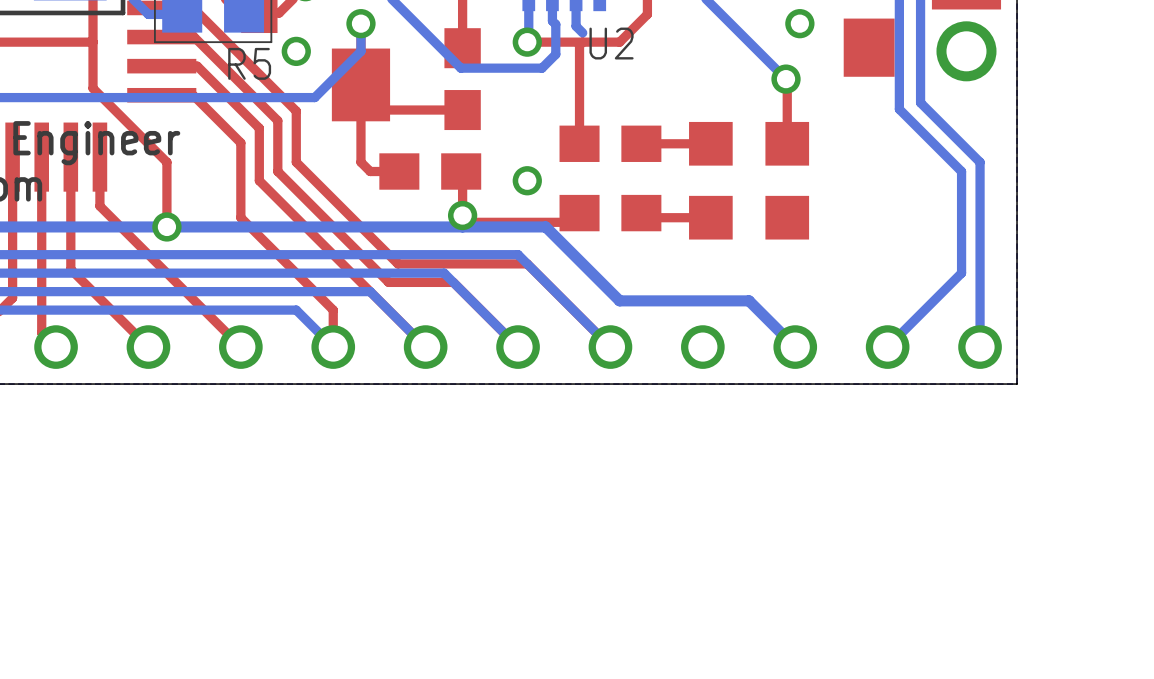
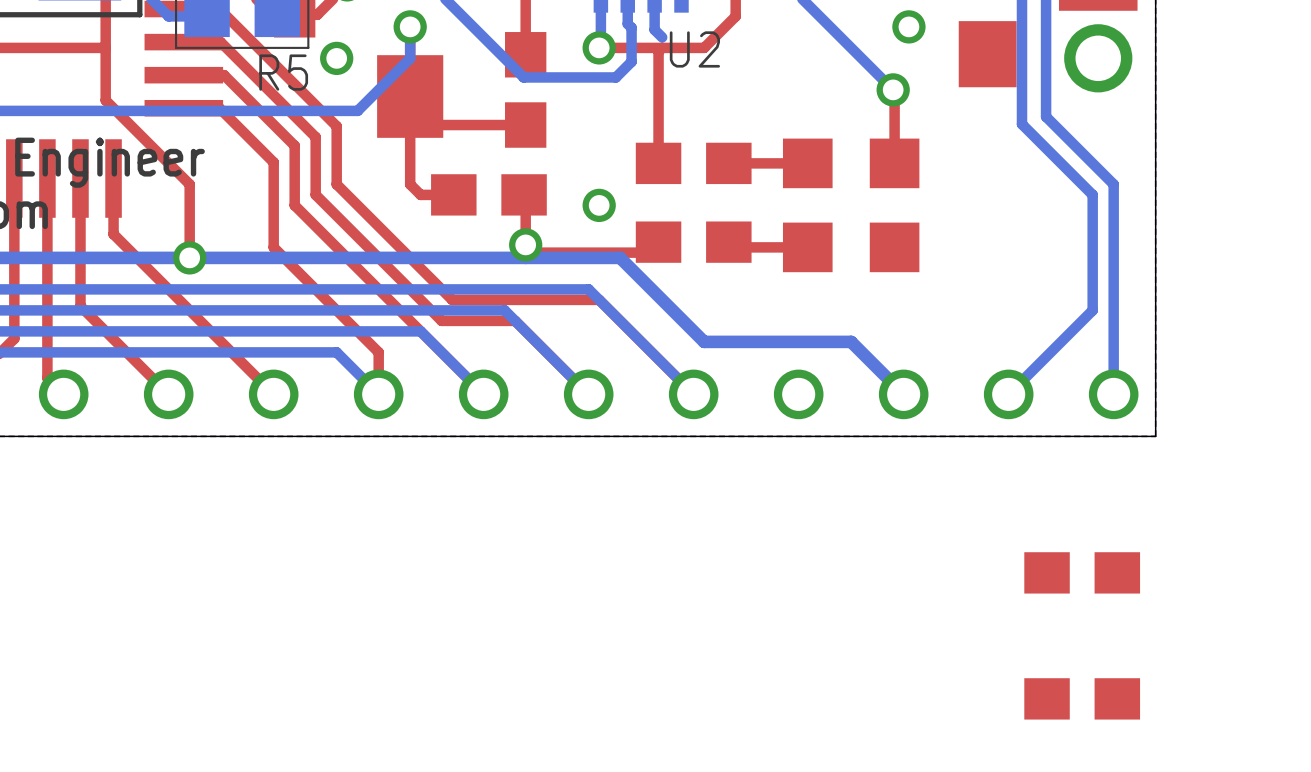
part: none -> (1082, 572)
part: none -> (1082, 698)

